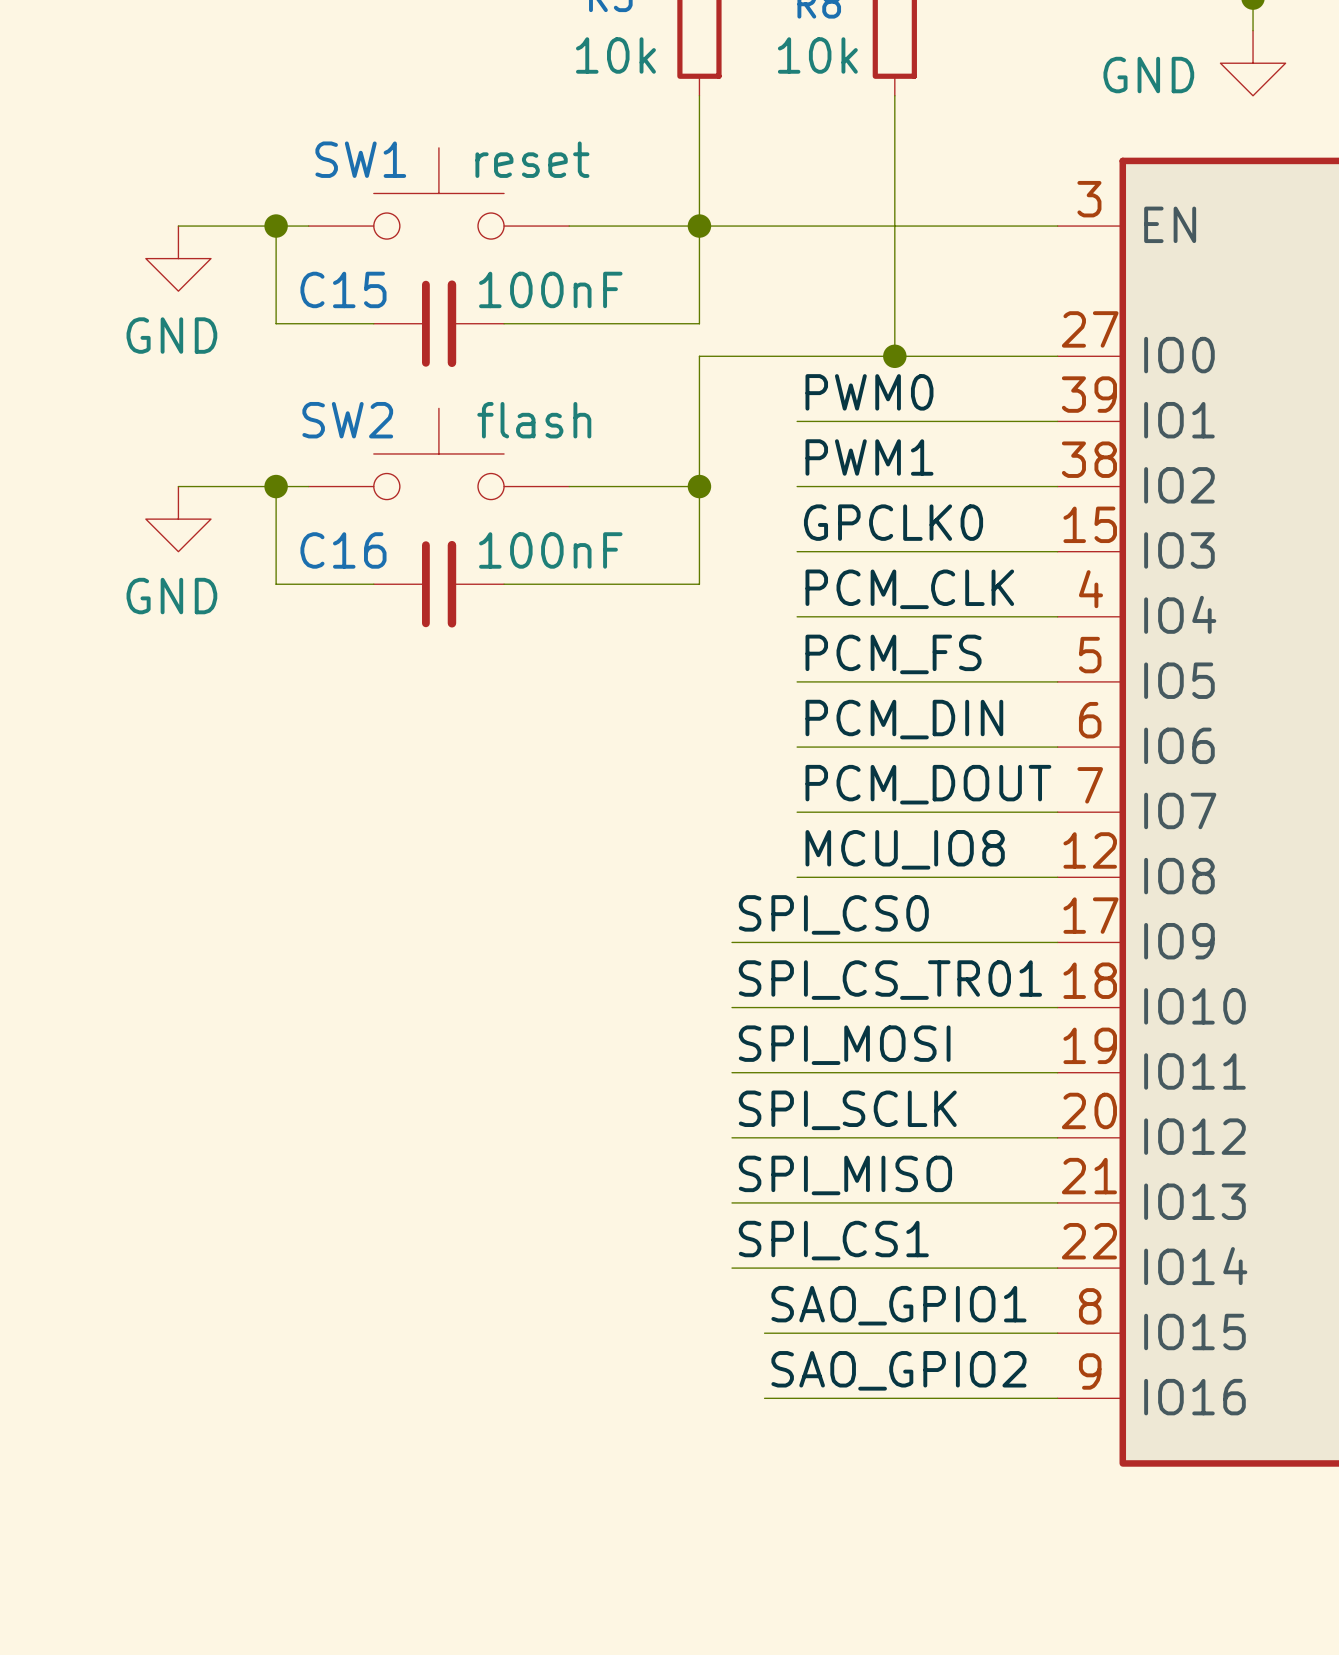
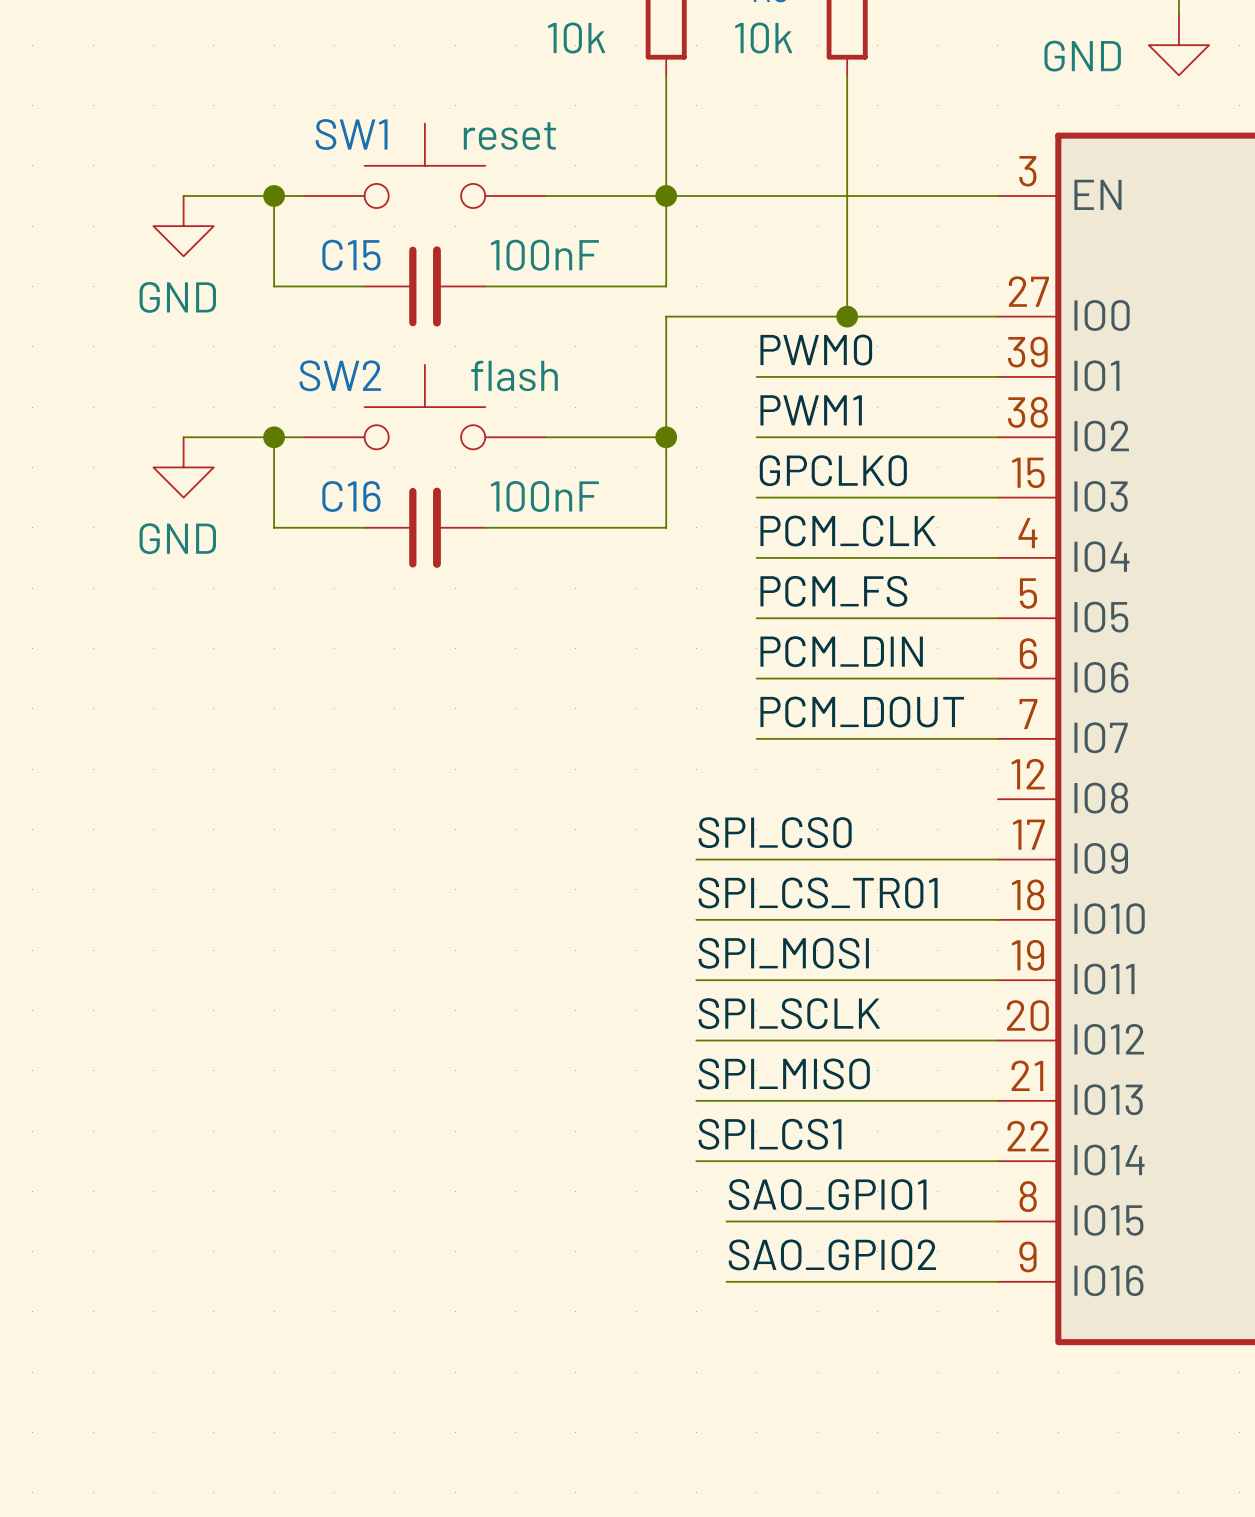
label: MCU_IO8 (905, 849) -> none
wire: (797, 877) (1057, 877) -> none

